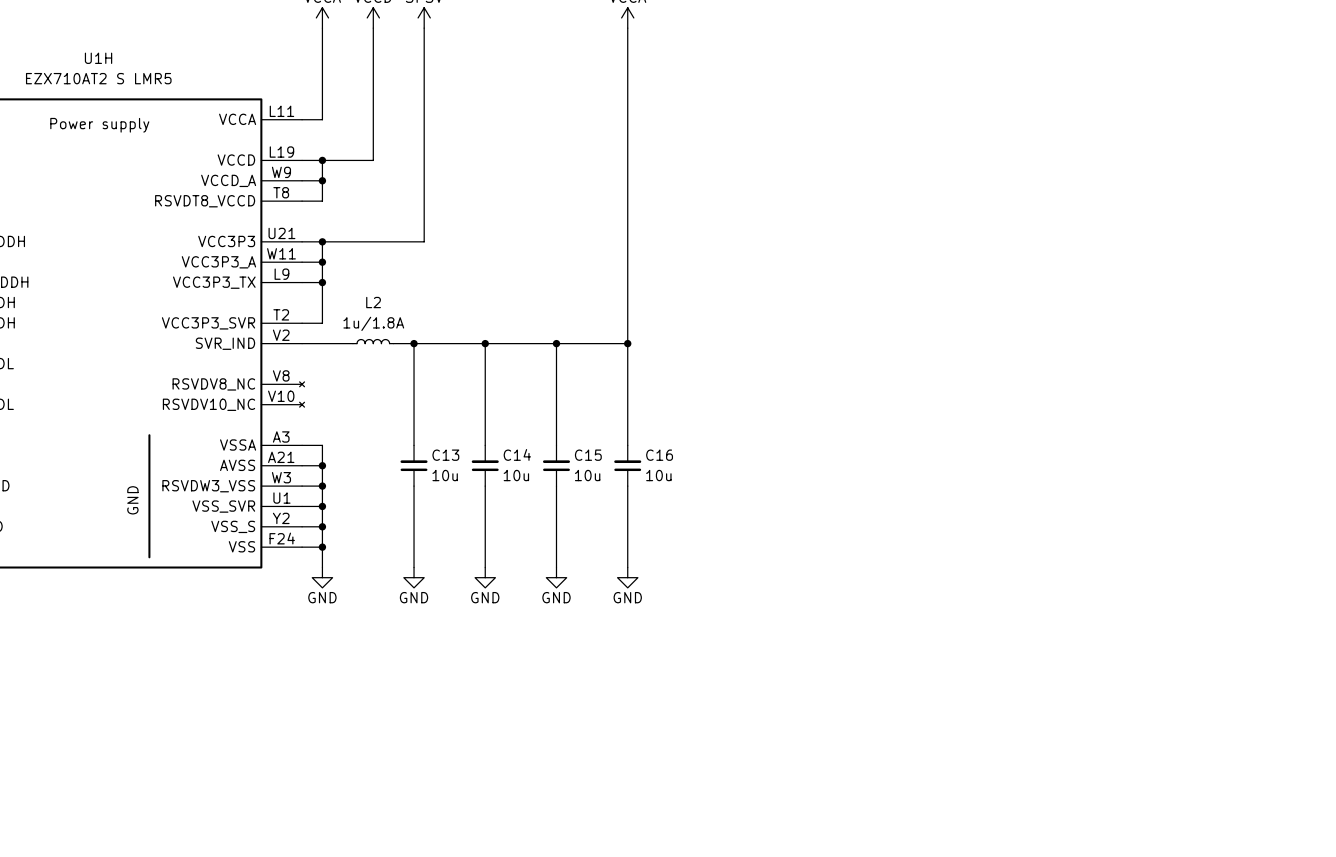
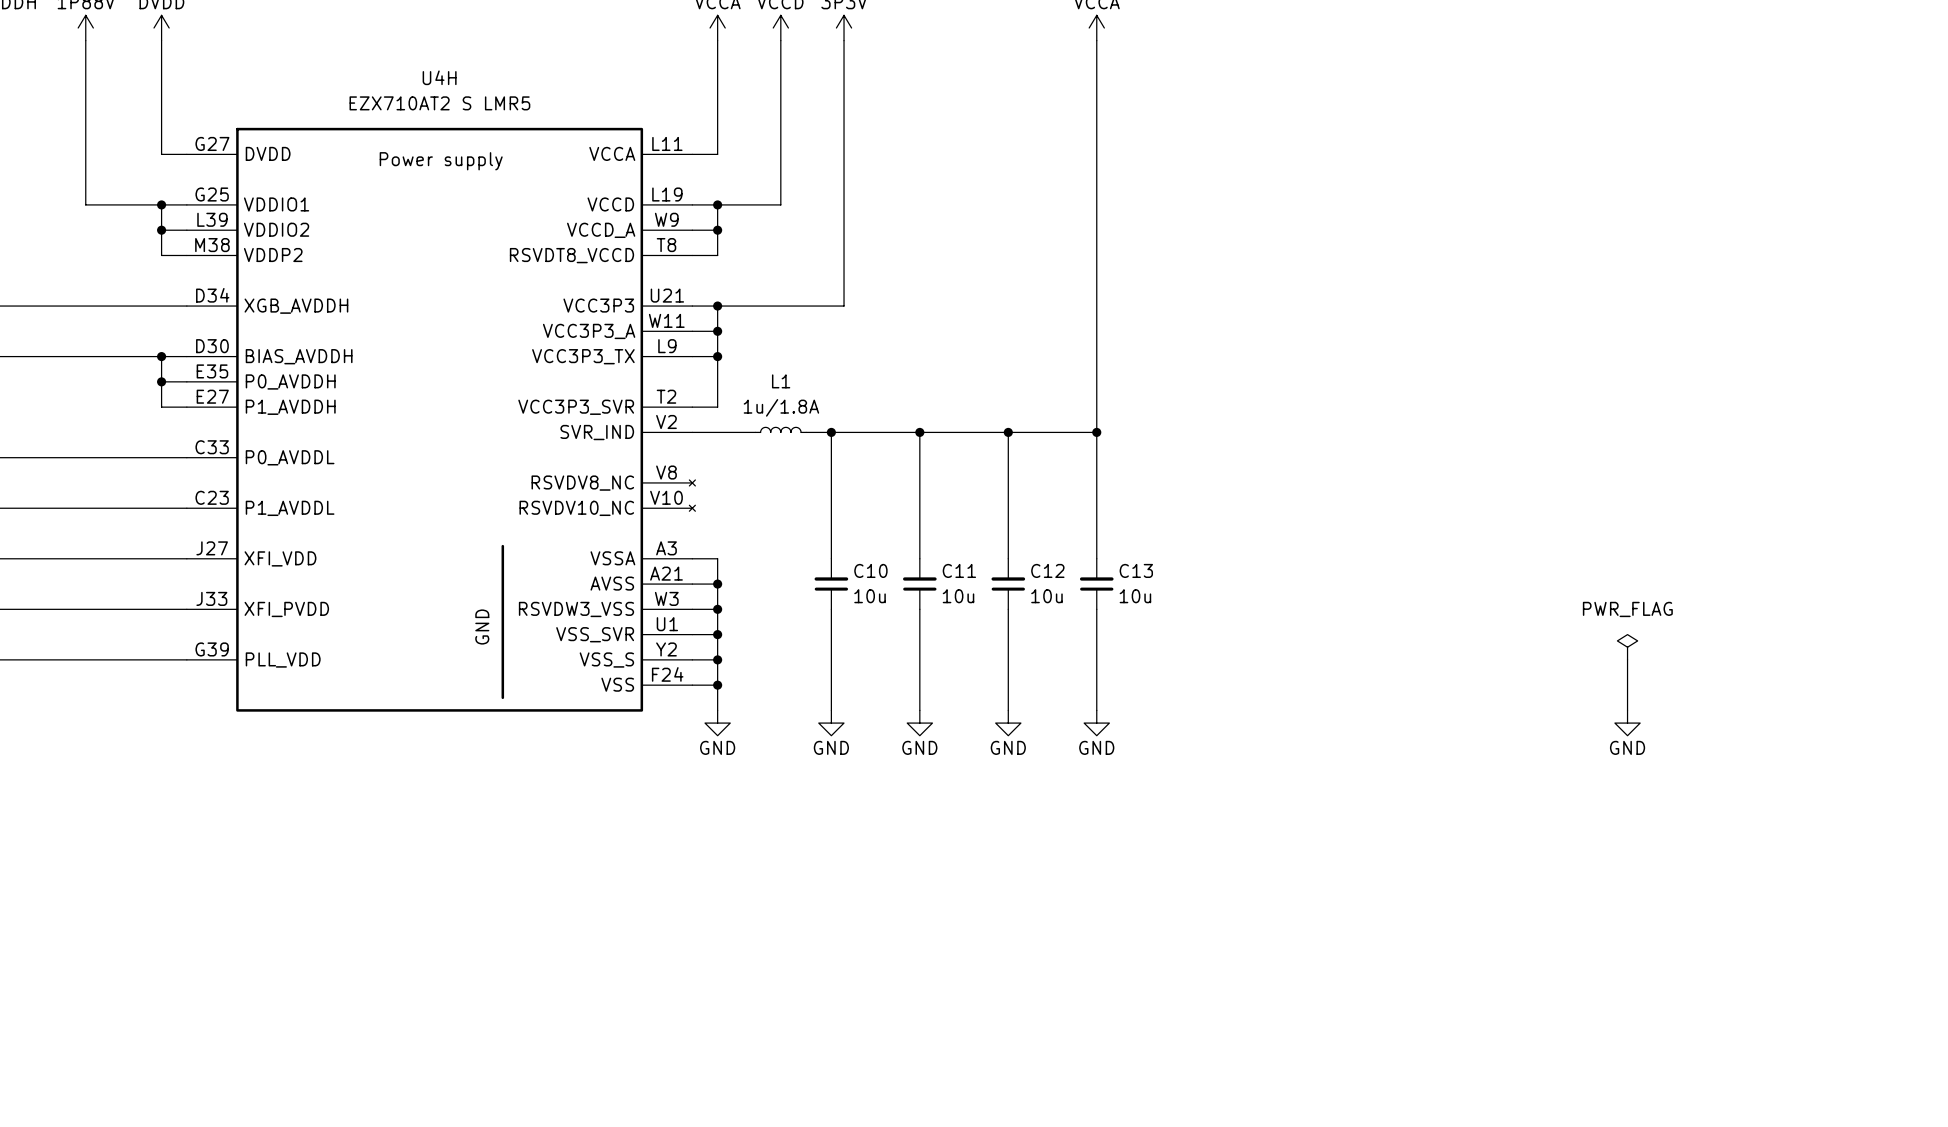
U1H name: U1H (98, 58) -> U4H (439, 77)
L2 name: L2 (373, 302) -> L1 (781, 381)
C14 name: C14 (517, 454) -> C11 (959, 570)
C13 name: C13 (445, 455) -> C10 (870, 570)
C15 name: C15 (588, 455) -> C12 (1047, 570)
C16 name: C16 (659, 455) -> C13 (1136, 570)
power symbol: none -> PWR_FLAG (1627, 647)
wire: none -> (1627, 659) (1627, 710)
power symbol: none -> GND (1627, 723)

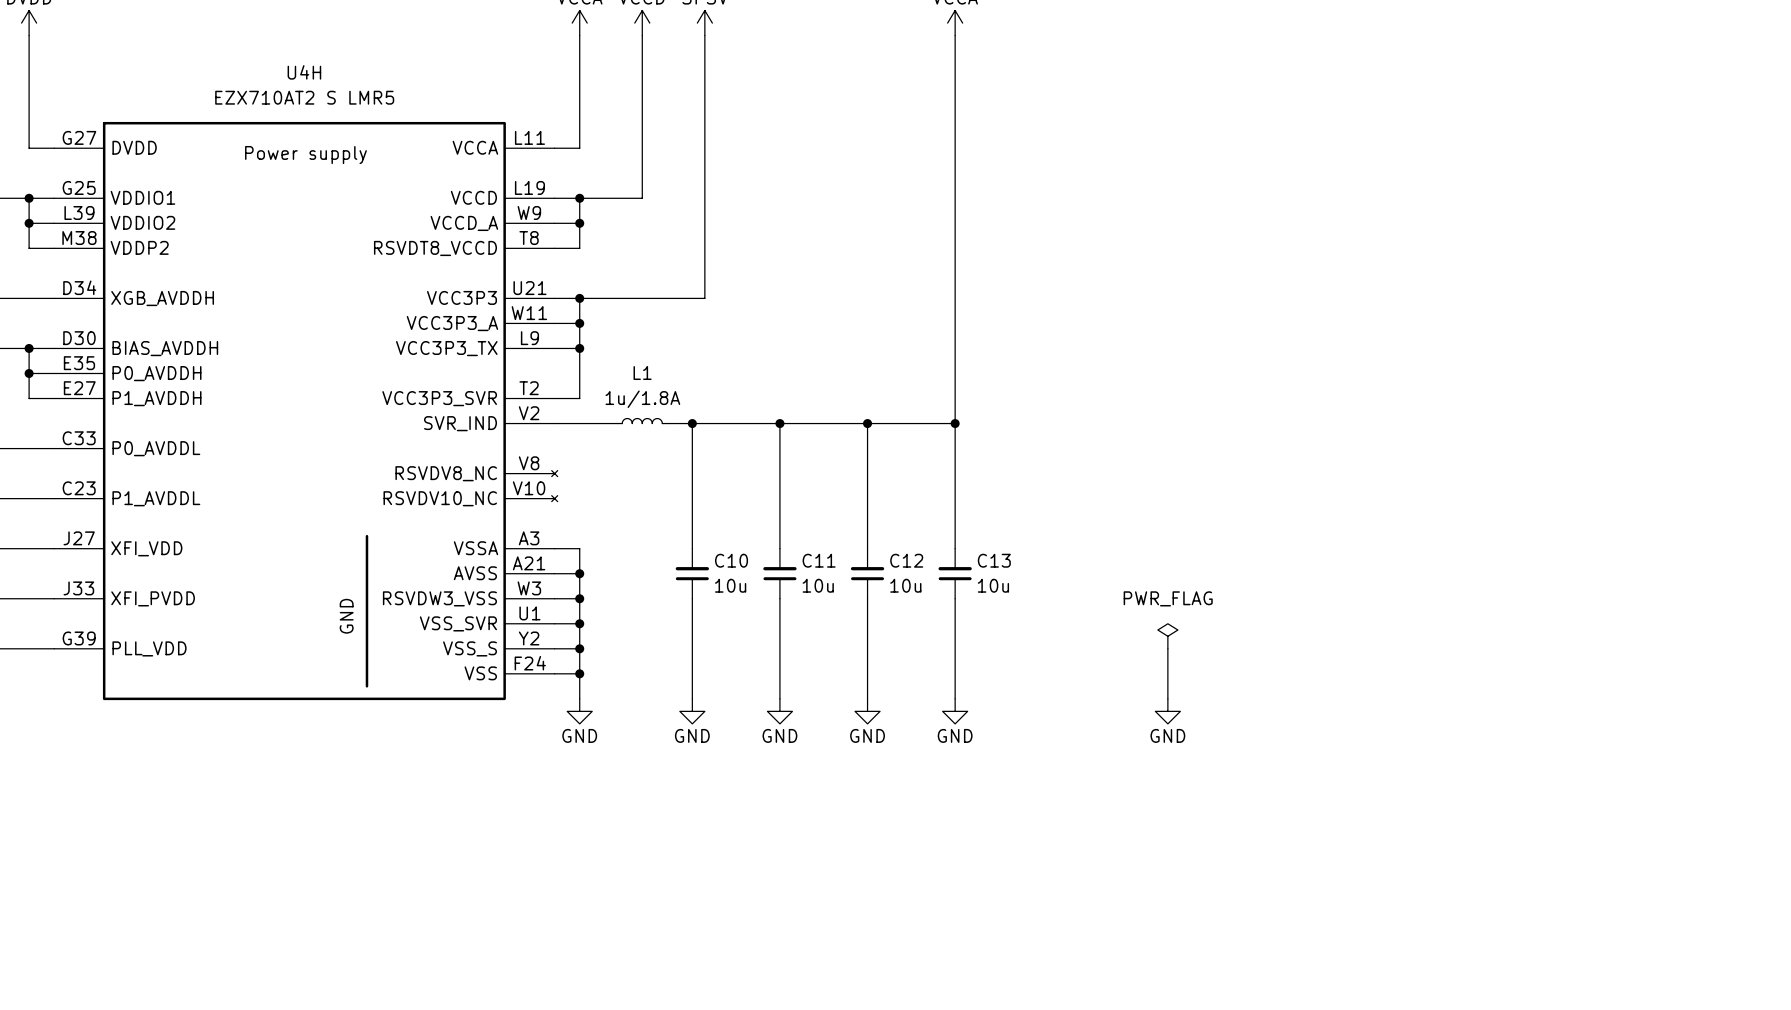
power symbol: none -> PWR_FLAG (1167, 636)
power symbol: PWR_FLAG (1627, 647) -> none
wire: none -> (1167, 648) (1167, 698)
wire: (1627, 659) (1627, 710) -> none
power symbol: none -> GND (1167, 711)
power symbol: GND (1627, 723) -> none

